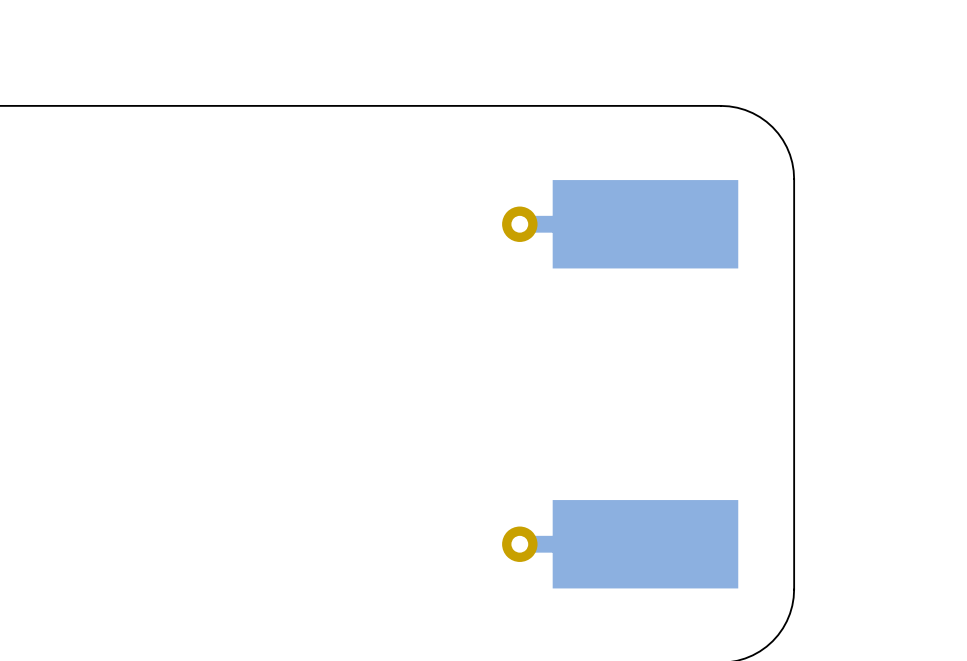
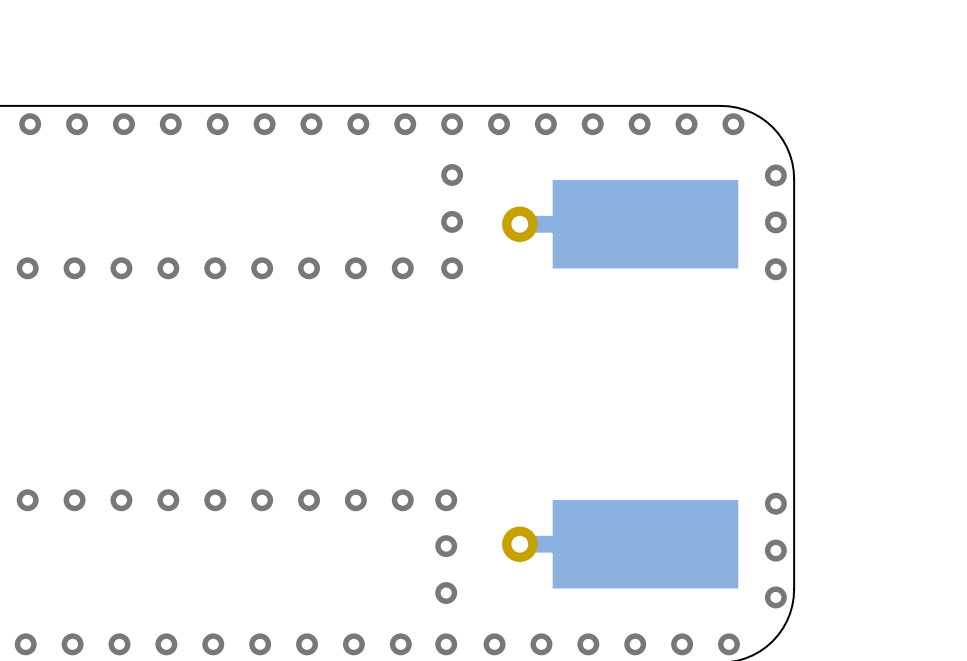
via: none -> (30, 124)
via: none -> (77, 124)
via: none -> (123, 124)
via: none -> (170, 124)
via: none -> (217, 124)
via: none -> (264, 124)
via: none -> (311, 124)
via: none -> (358, 124)
via: none -> (405, 124)
via: none -> (452, 124)
via: none -> (499, 124)
via: none -> (545, 124)
via: none -> (592, 124)
via: none -> (639, 124)
via: none -> (686, 124)
via: none -> (733, 124)
via: none -> (452, 174)
via: none -> (775, 175)
via: none -> (452, 221)
via: none -> (775, 222)
via: none -> (27, 268)
via: none -> (74, 268)
via: none -> (121, 268)
via: none -> (168, 268)
via: none -> (215, 268)
via: none -> (262, 268)
via: none -> (309, 268)
via: none -> (355, 268)
via: none -> (402, 268)
via: none -> (452, 268)
via: none -> (775, 269)
via: none -> (27, 500)
via: none -> (74, 500)
via: none -> (121, 500)
via: none -> (168, 500)
via: none -> (215, 500)
via: none -> (262, 500)
via: none -> (309, 500)
via: none -> (355, 500)
via: none -> (402, 500)
via: none -> (446, 500)
via: none -> (775, 503)
via: none -> (446, 546)
via: none -> (775, 550)
via: none -> (446, 593)
via: none -> (775, 597)
via: none -> (25, 644)
via: none -> (72, 644)
via: none -> (119, 644)
via: none -> (166, 644)
via: none -> (213, 644)
via: none -> (260, 644)
via: none -> (307, 644)
via: none -> (353, 644)
via: none -> (400, 644)
via: none -> (446, 644)
via: none -> (494, 644)
via: none -> (541, 644)
via: none -> (588, 644)
via: none -> (635, 644)
via: none -> (682, 644)
via: none -> (728, 644)

